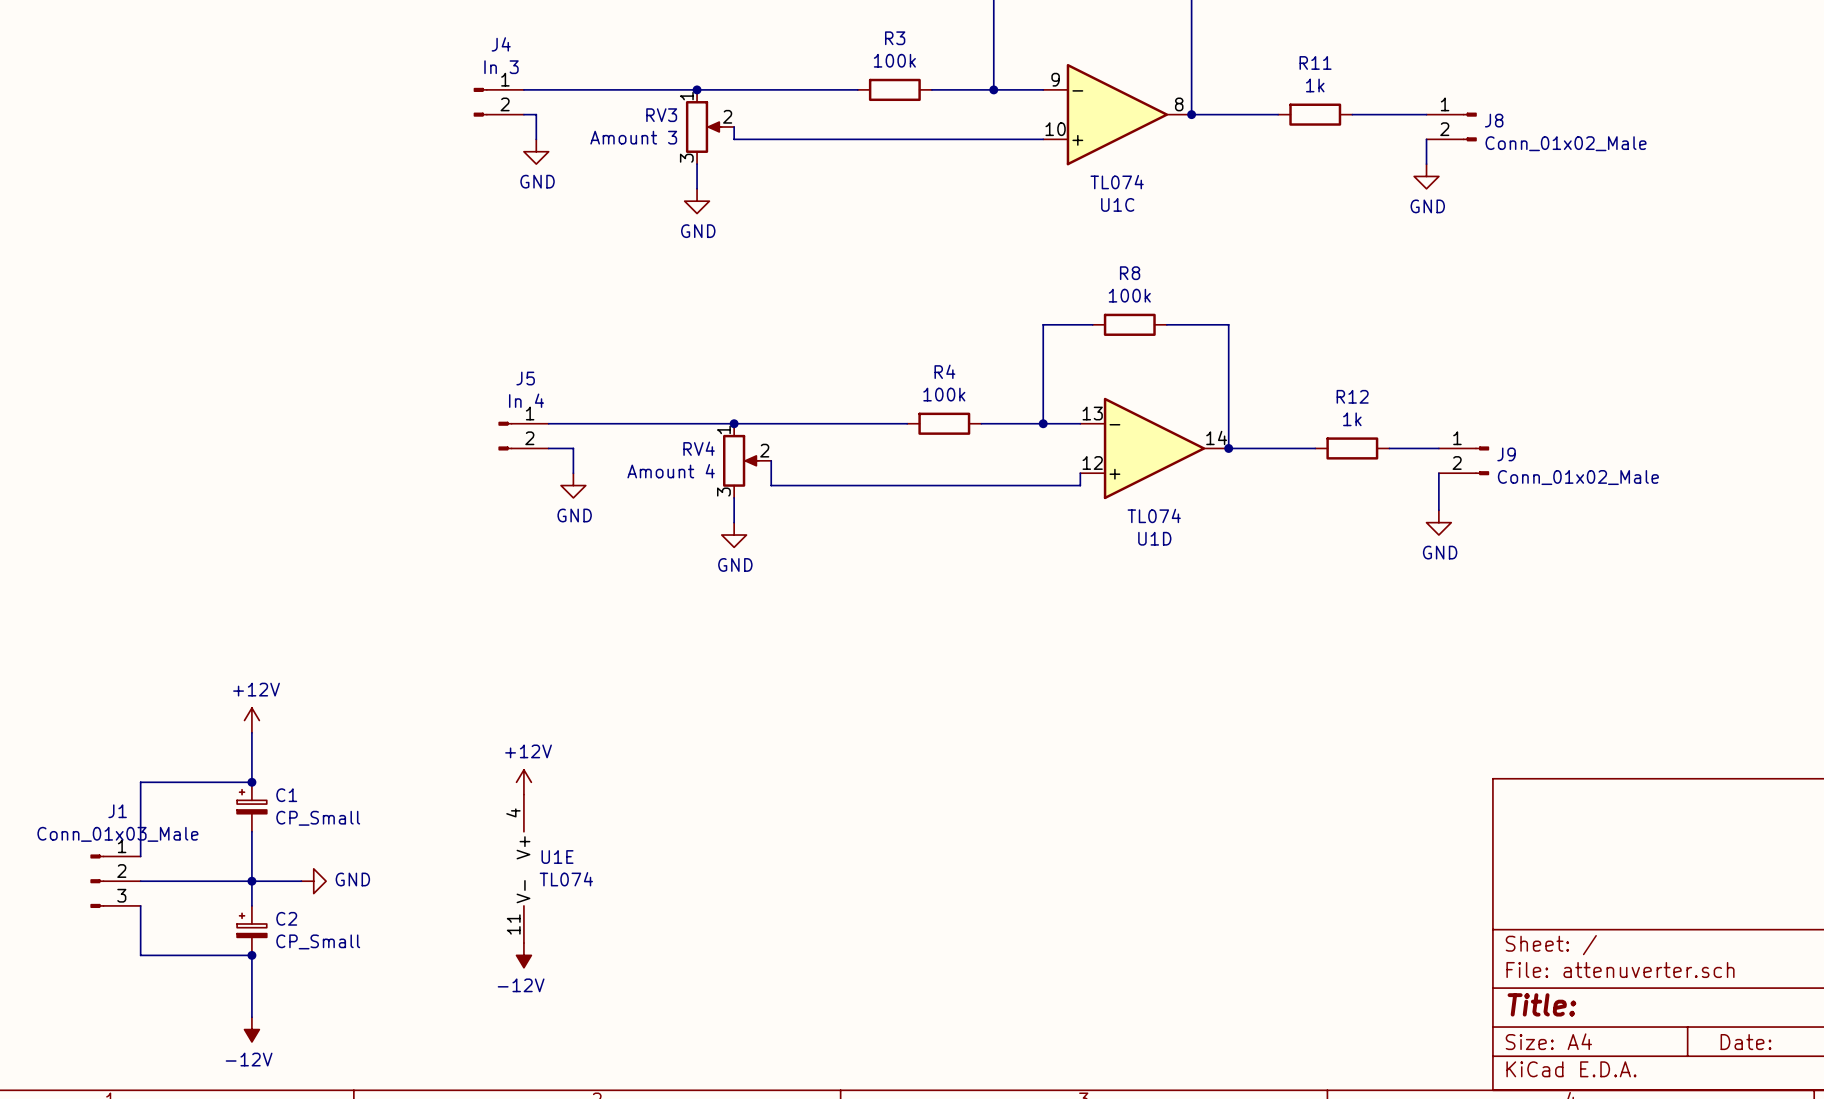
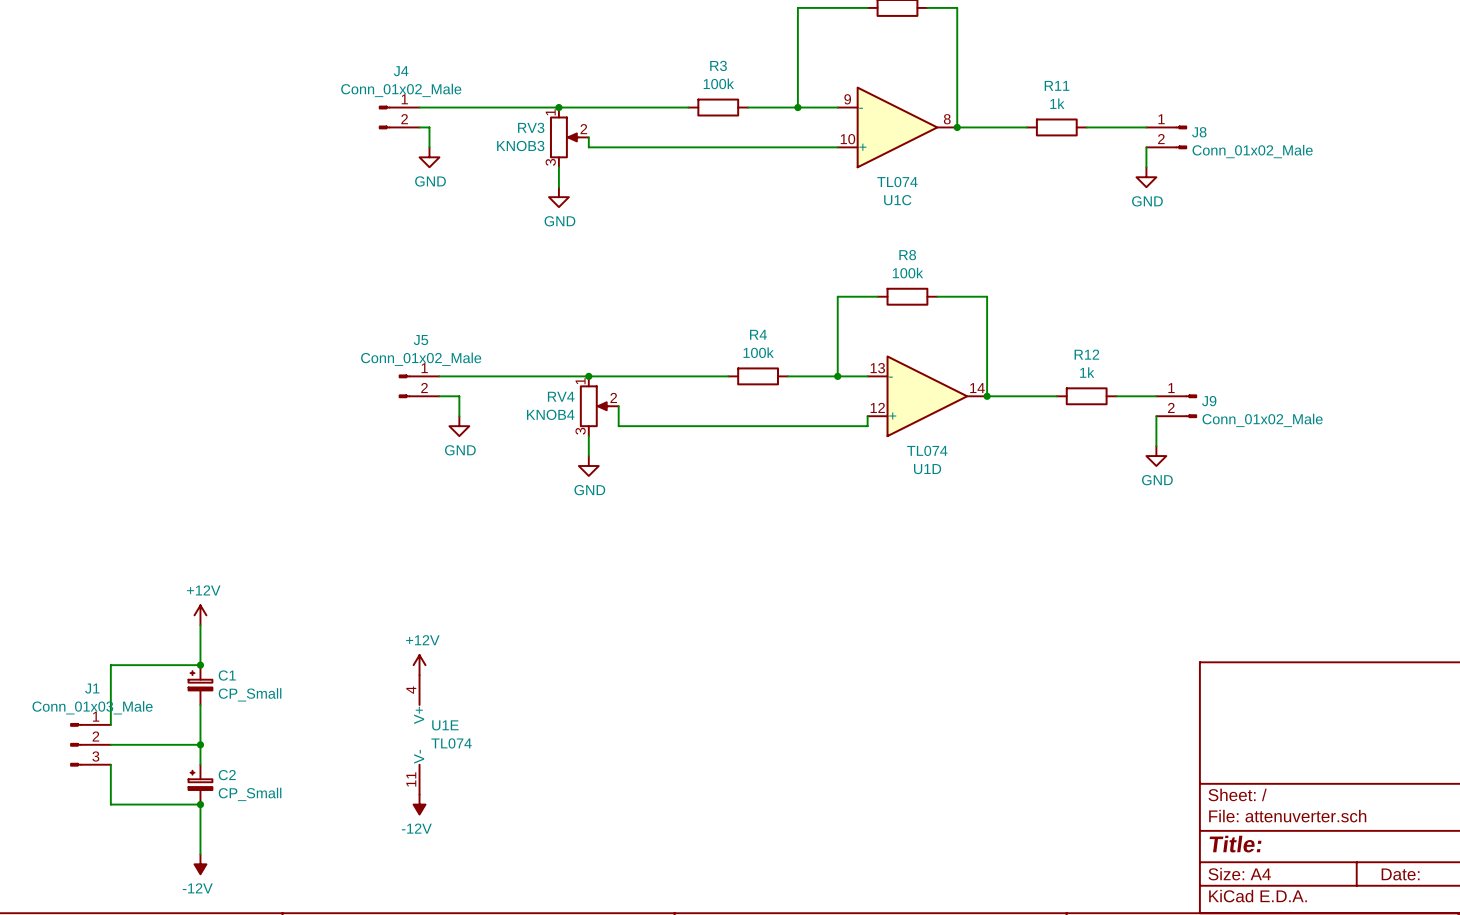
J4 value: In 3 (501, 67) -> Conn_01x02_Male (401, 90)
RV3 value: Amount 3 (633, 137) -> KNOB3 (520, 145)
J5 value: In 4 (526, 400) -> Conn_01x02_Male (421, 359)
RV4 value: Amount 4 (671, 471) -> KNOB4 (550, 414)
wire: (251, 881) (301, 881) -> none
power symbol: GND (313, 881) -> none

